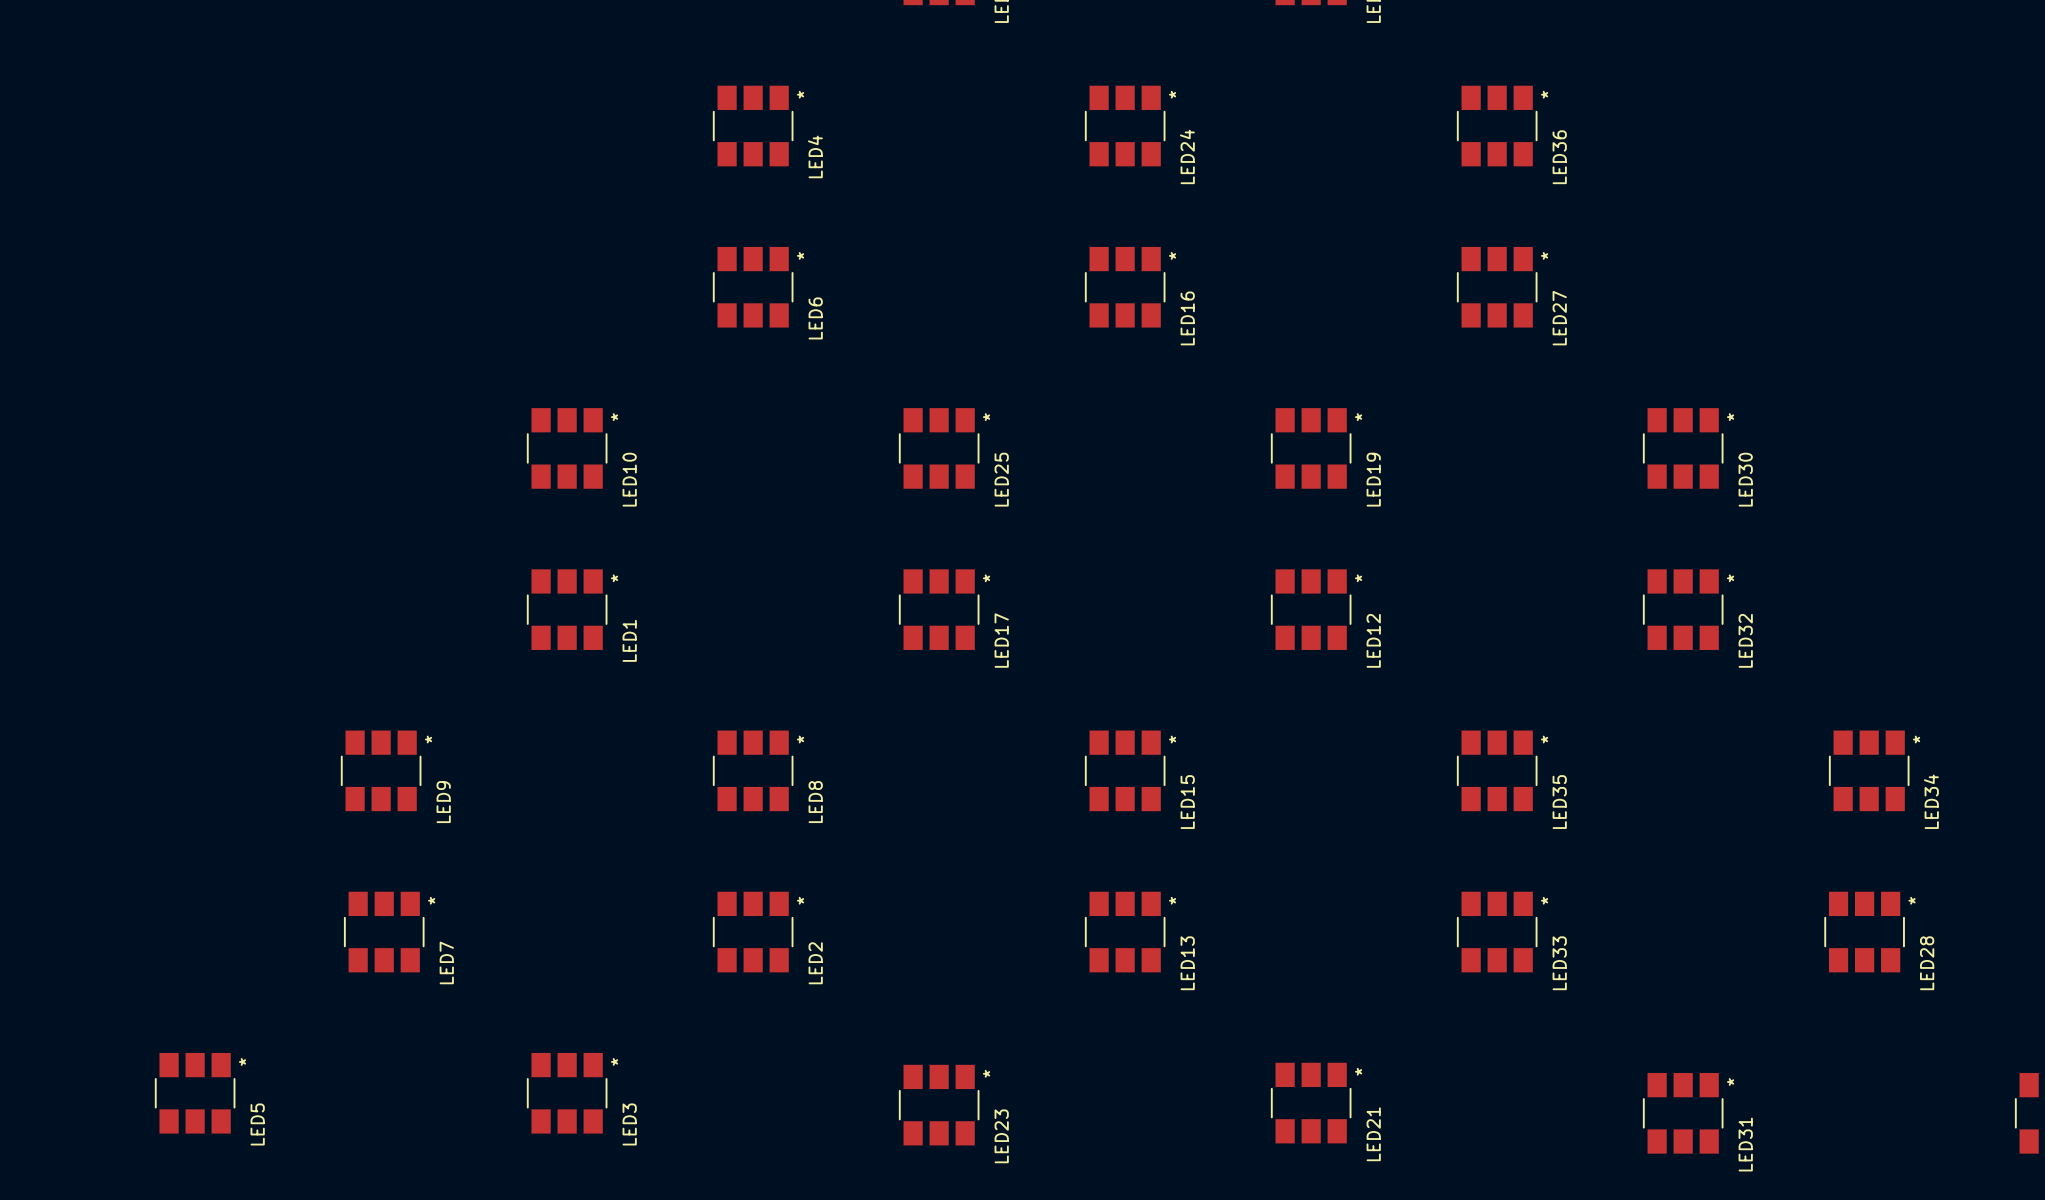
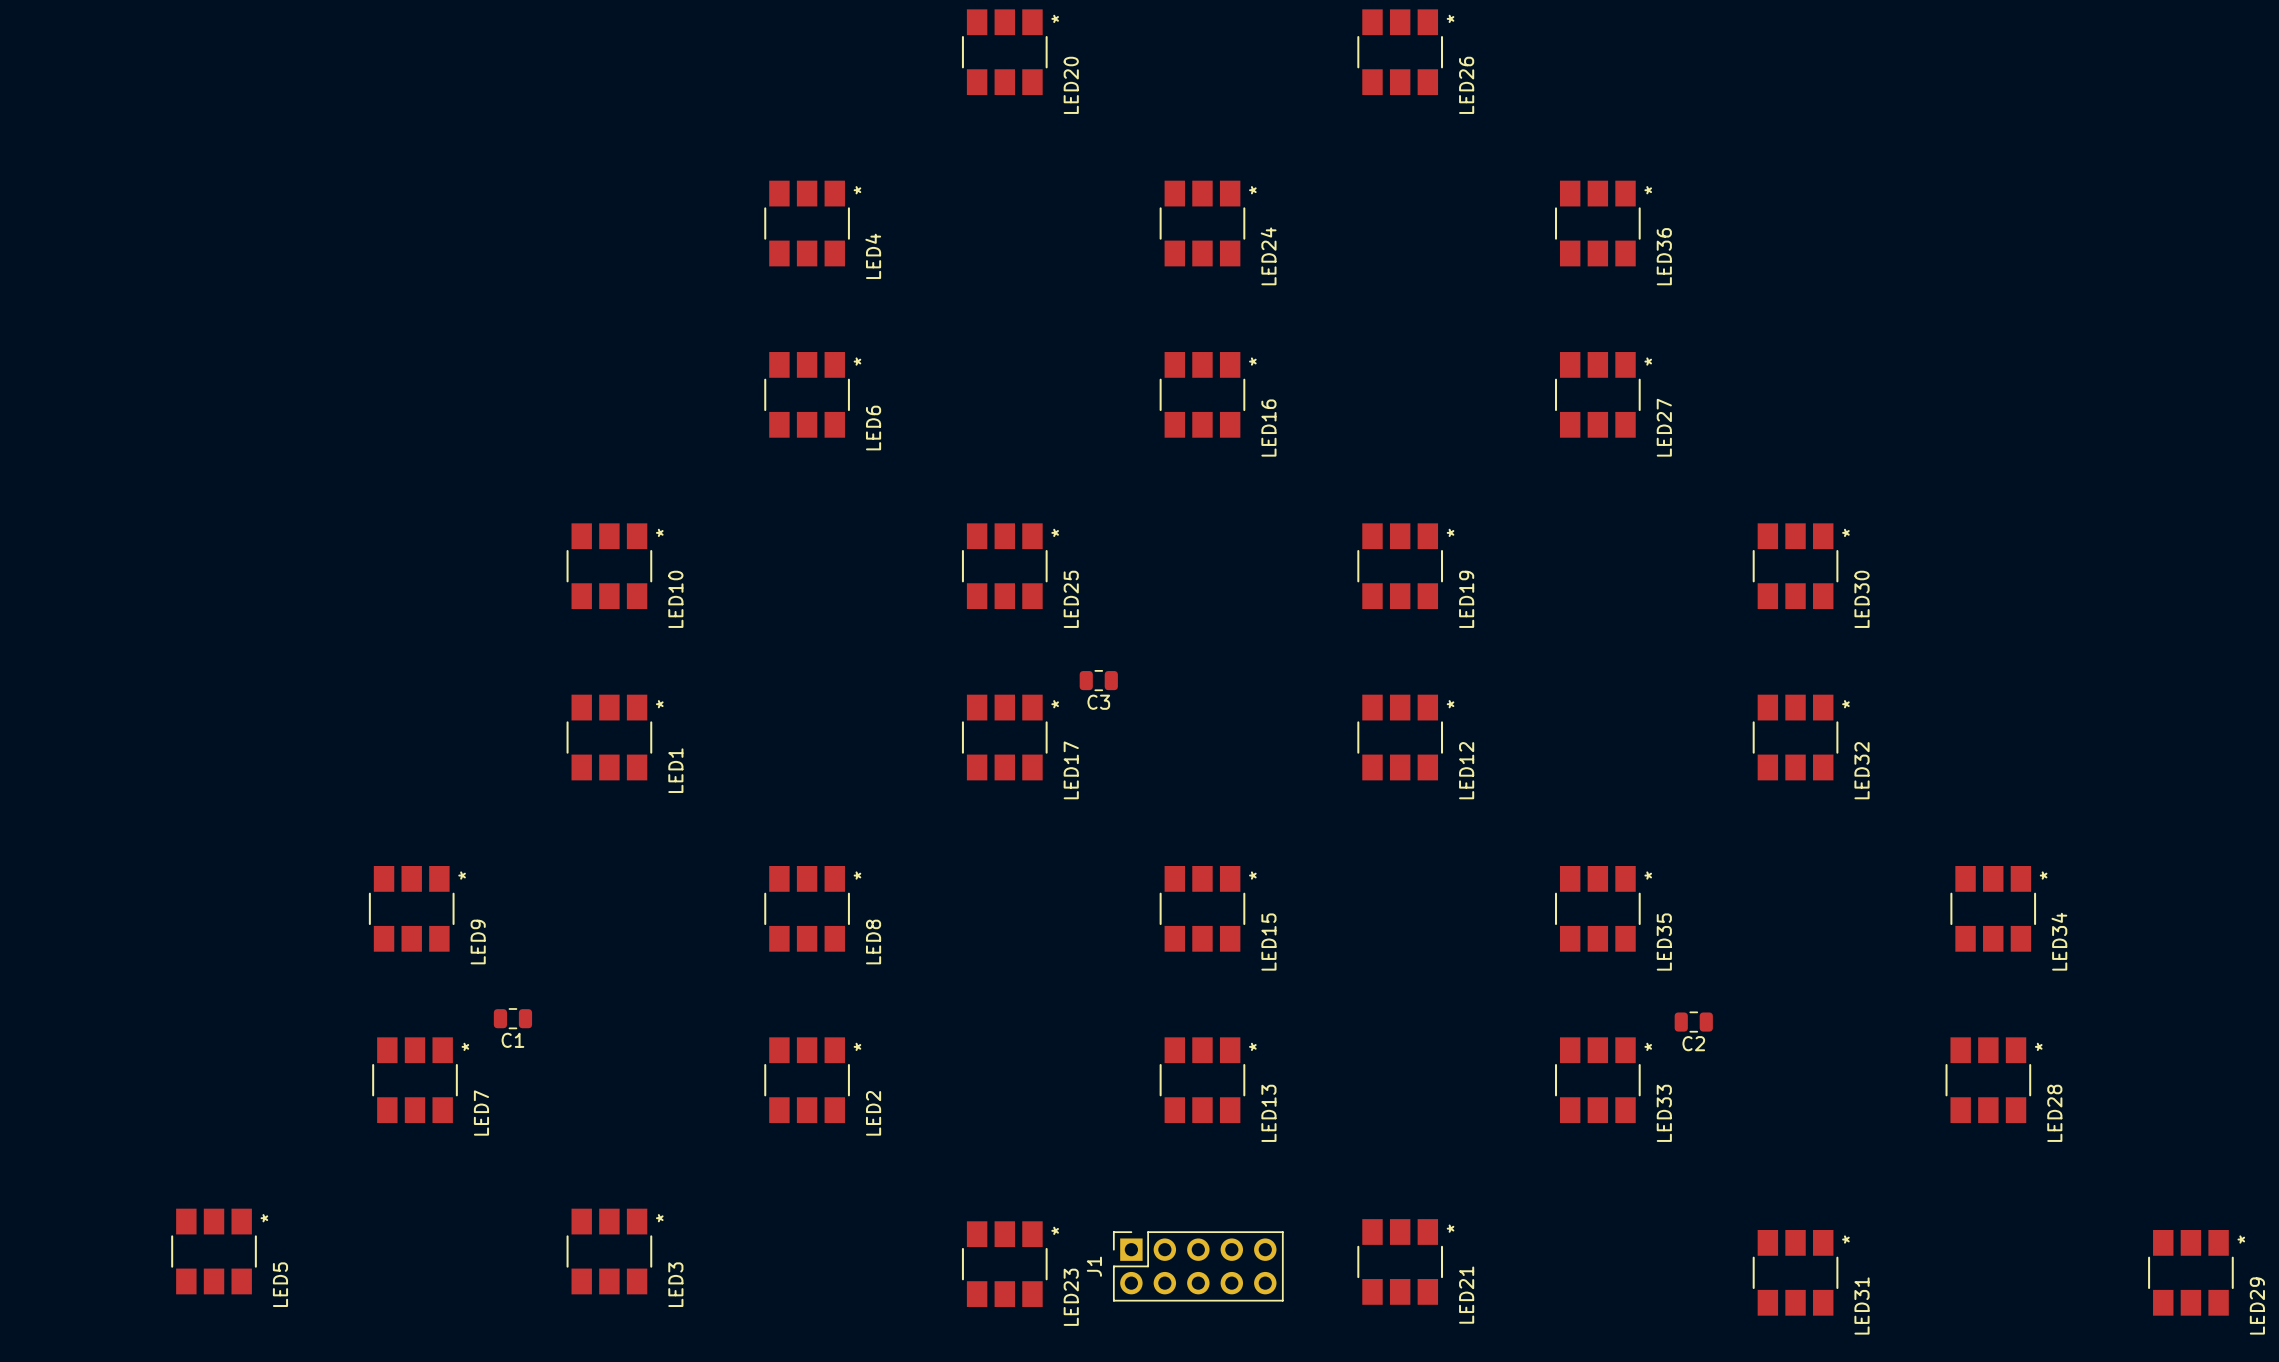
C3: none -> (1098, 680)
C1: none -> (512, 1018)
C2: none -> (1693, 1022)
J1: none -> (1198, 1266)

